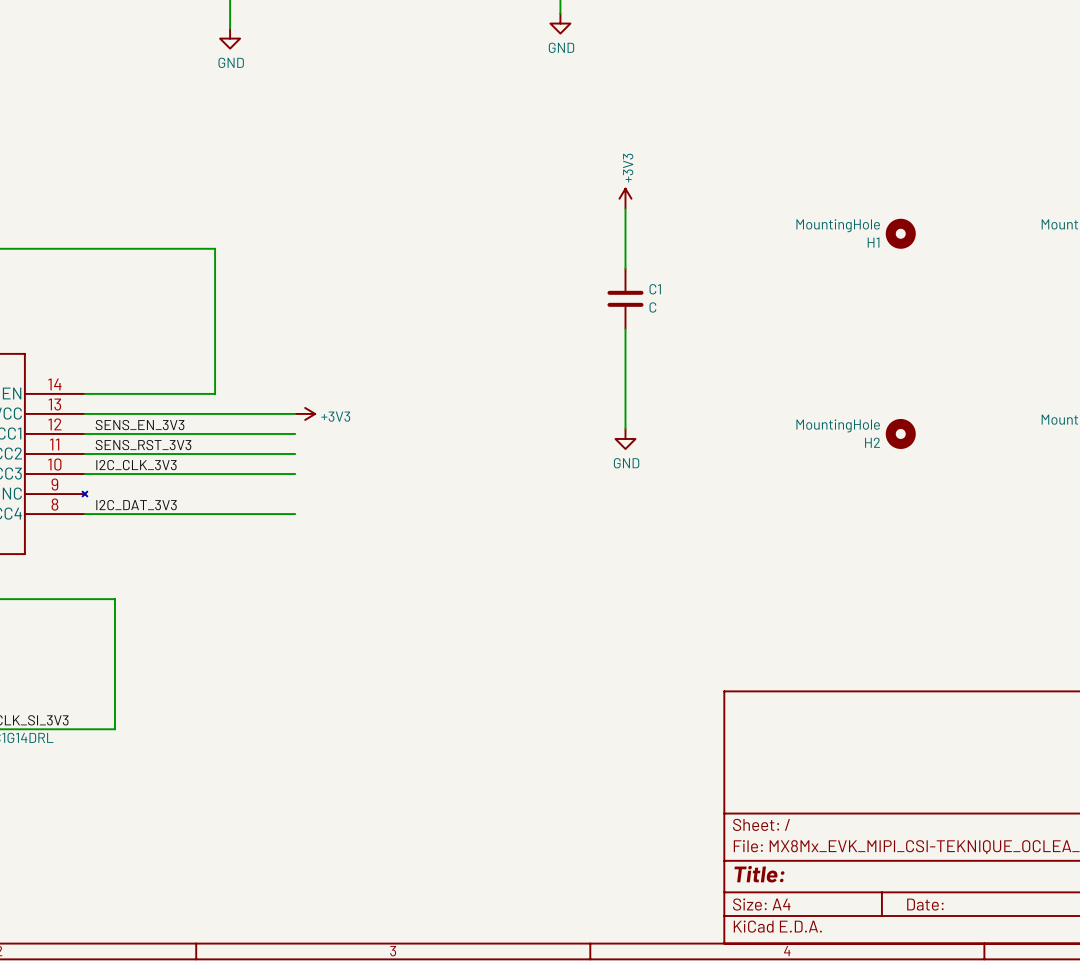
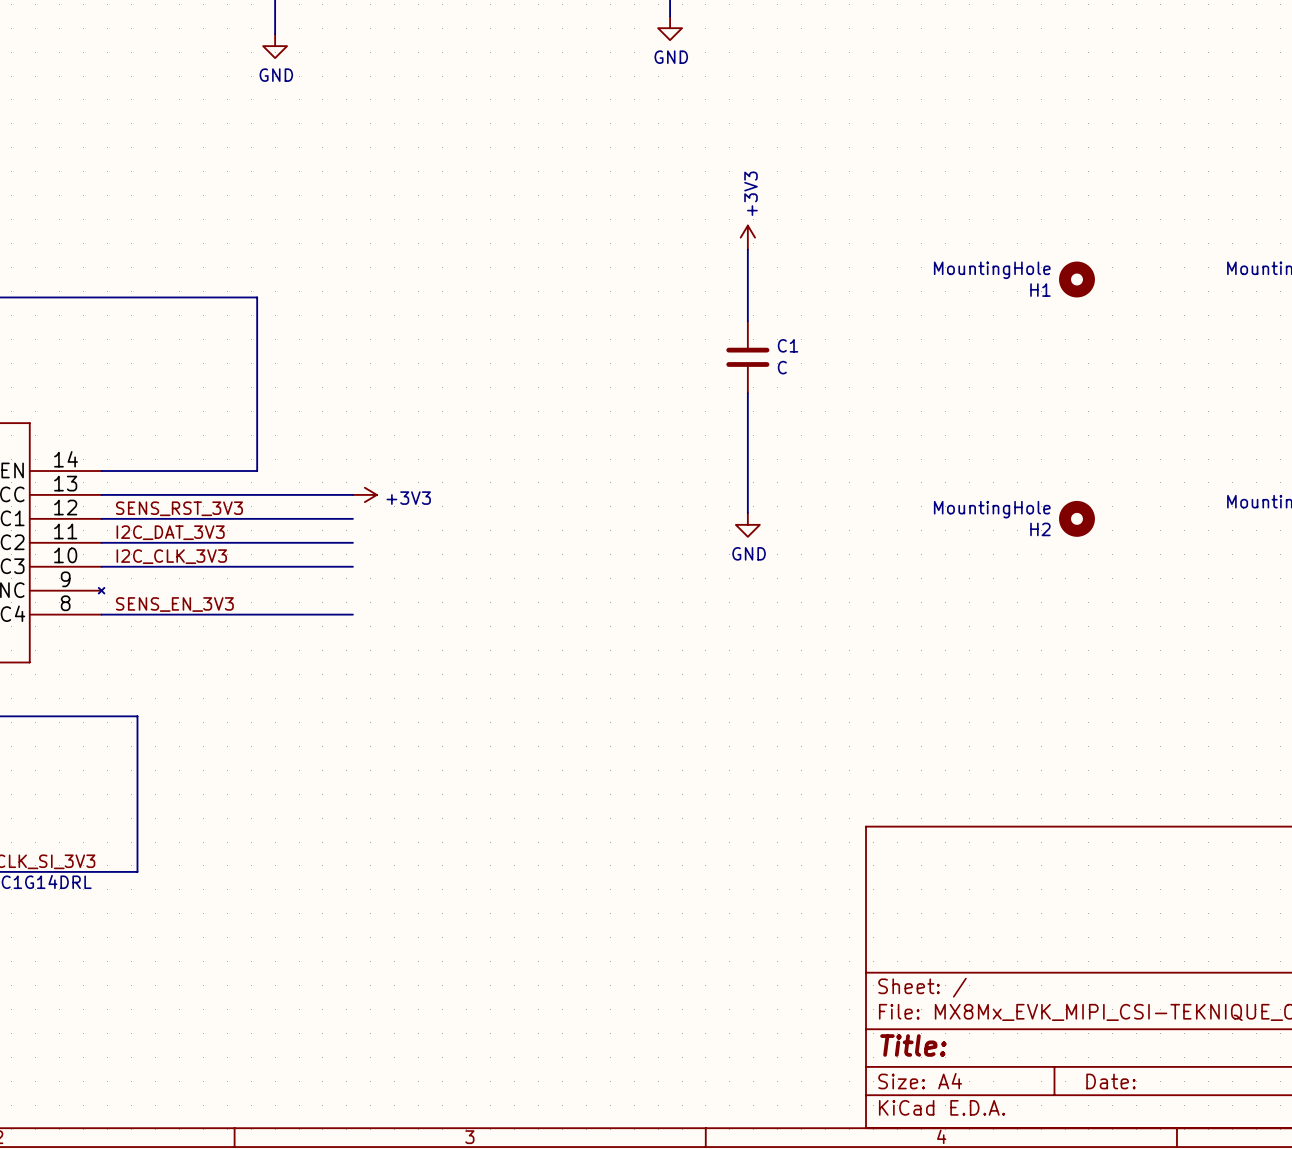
label: SENS_EN_3V3 (140, 425) -> SENS_RST_3V3 (179, 508)
label: SENS_RST_3V3 (143, 445) -> I2C_DAT_3V3 (170, 532)
label: I2C_DAT_3V3 (136, 505) -> SENS_EN_3V3 (174, 604)

